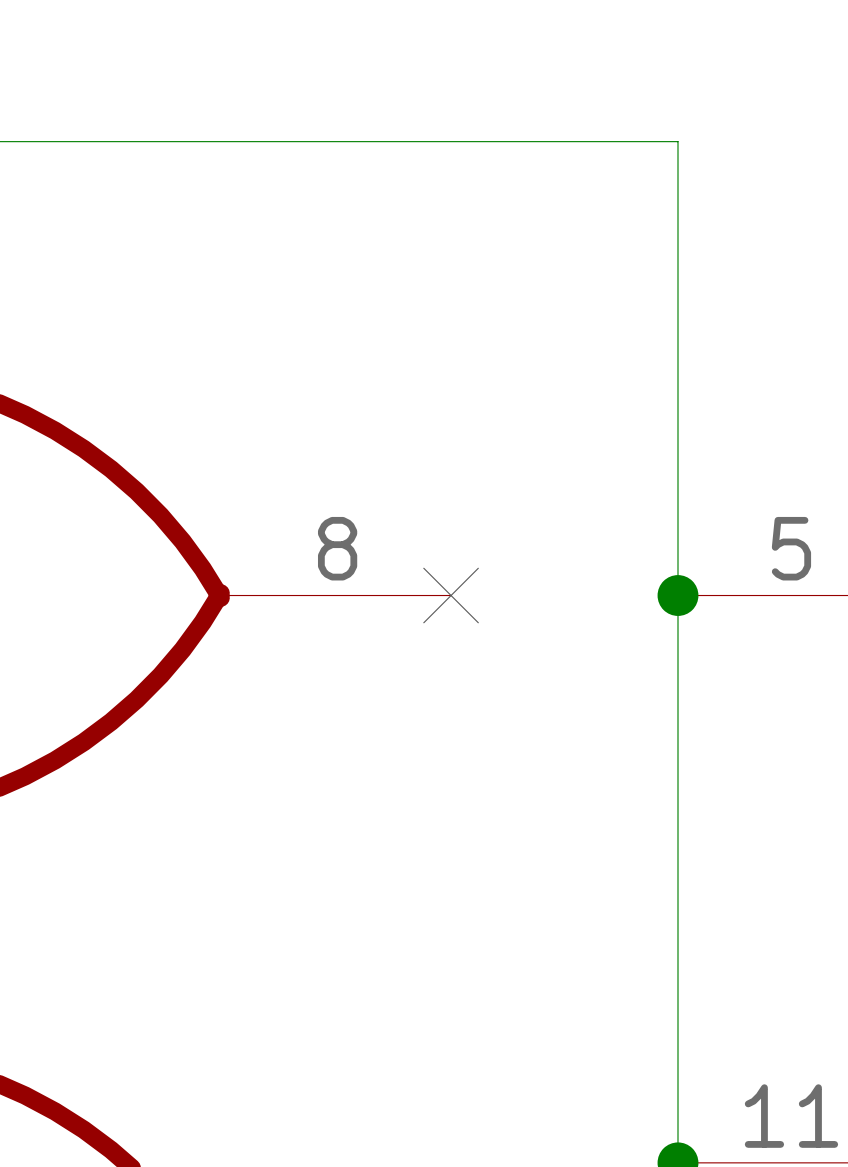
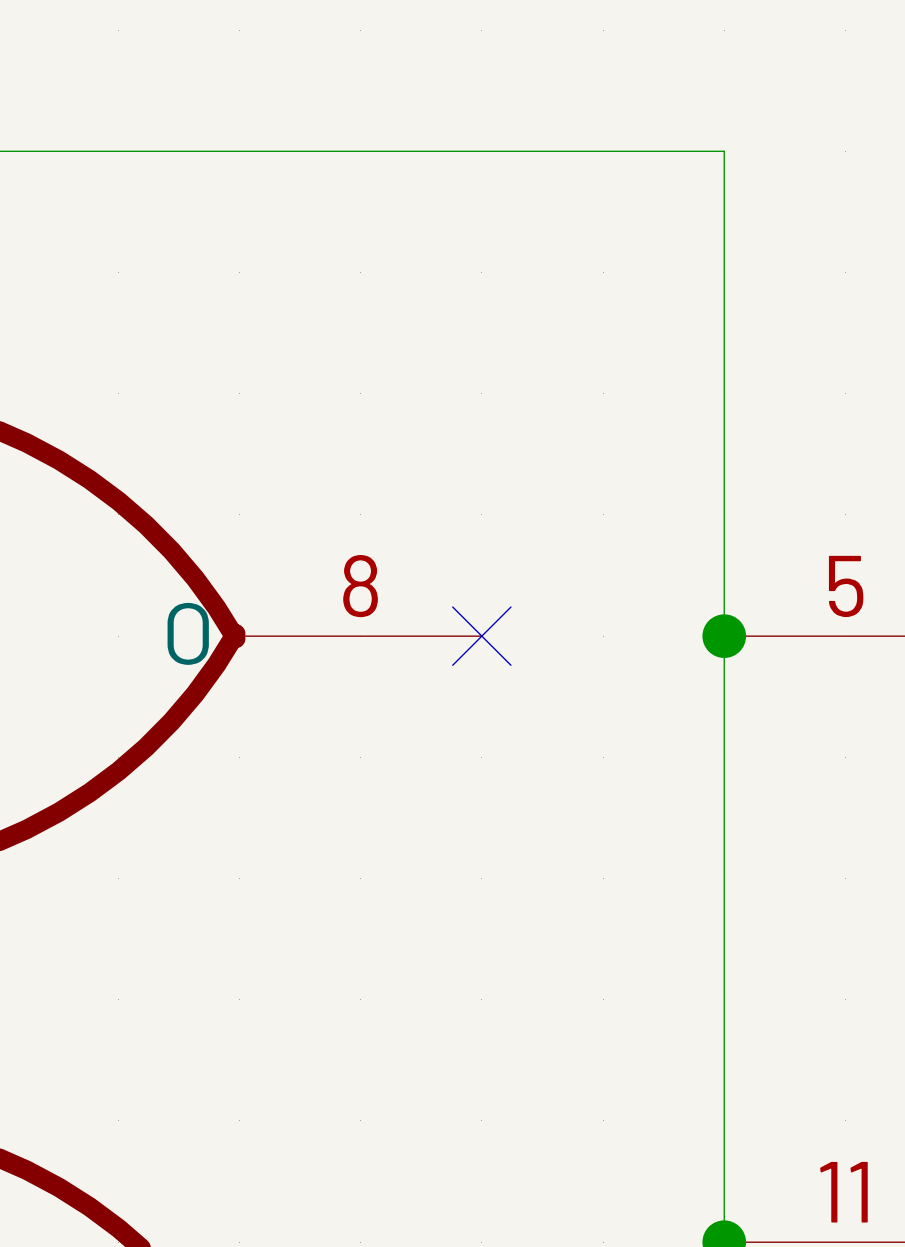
part pin name: none -> O (188, 633)

